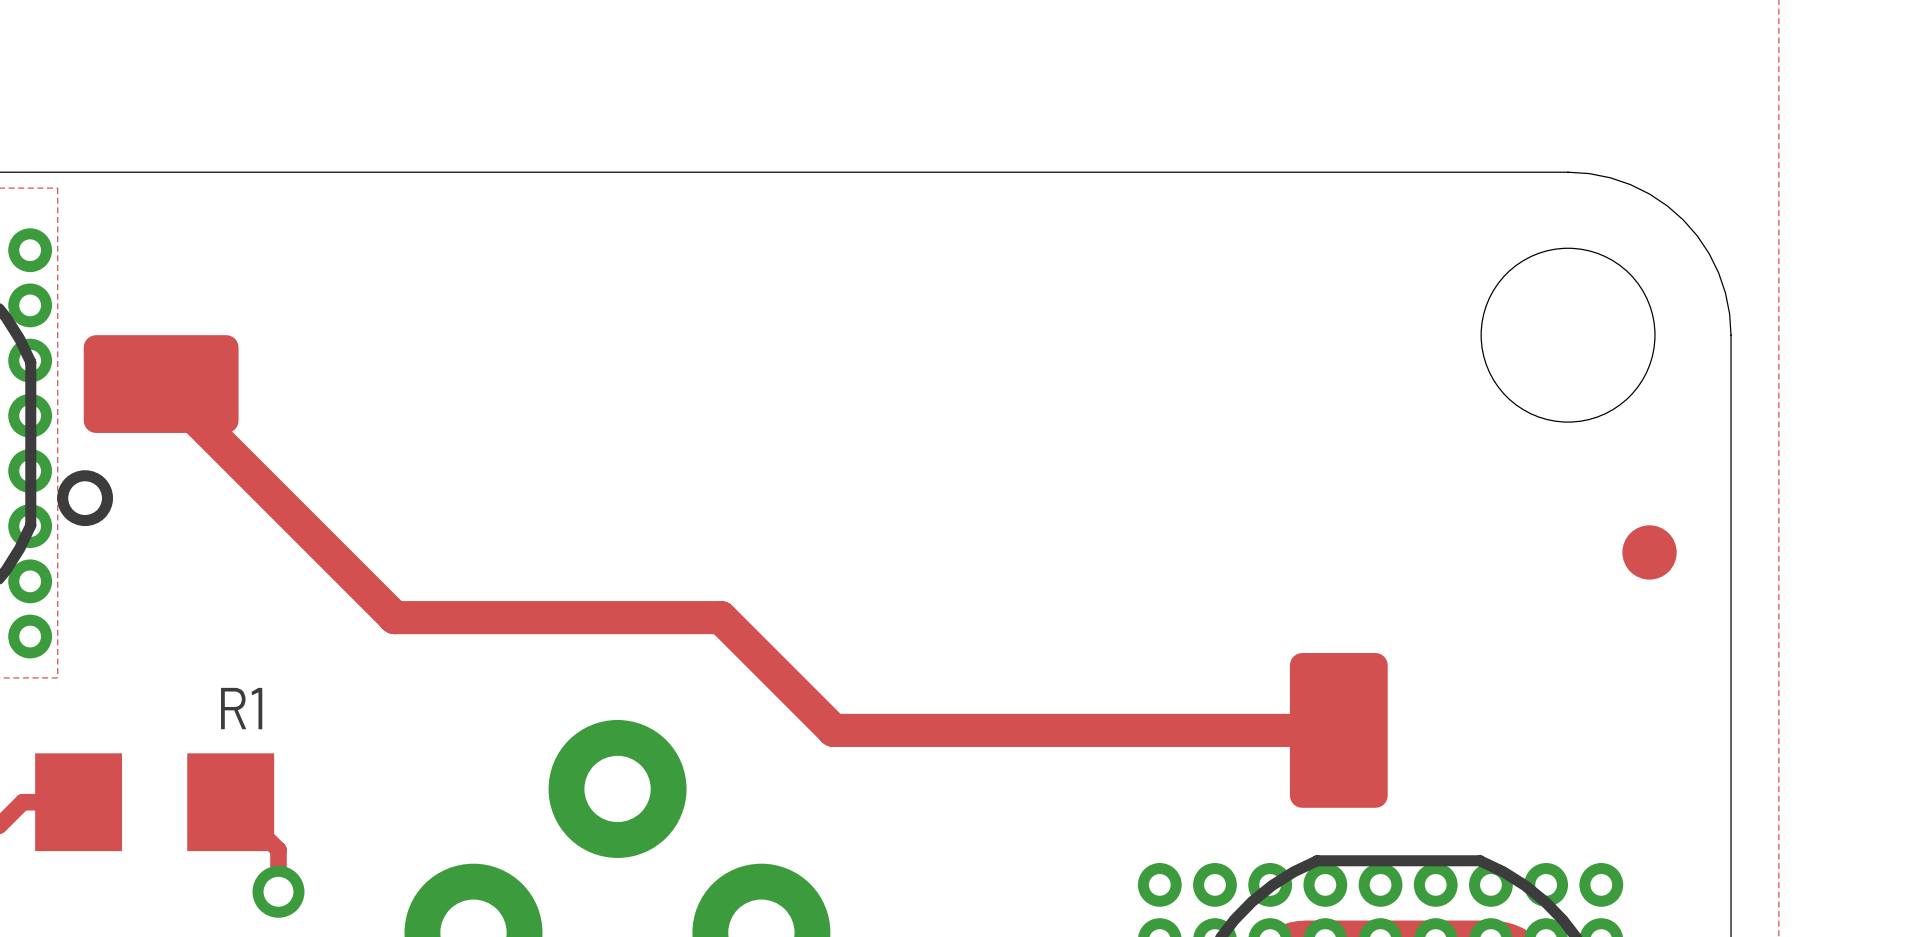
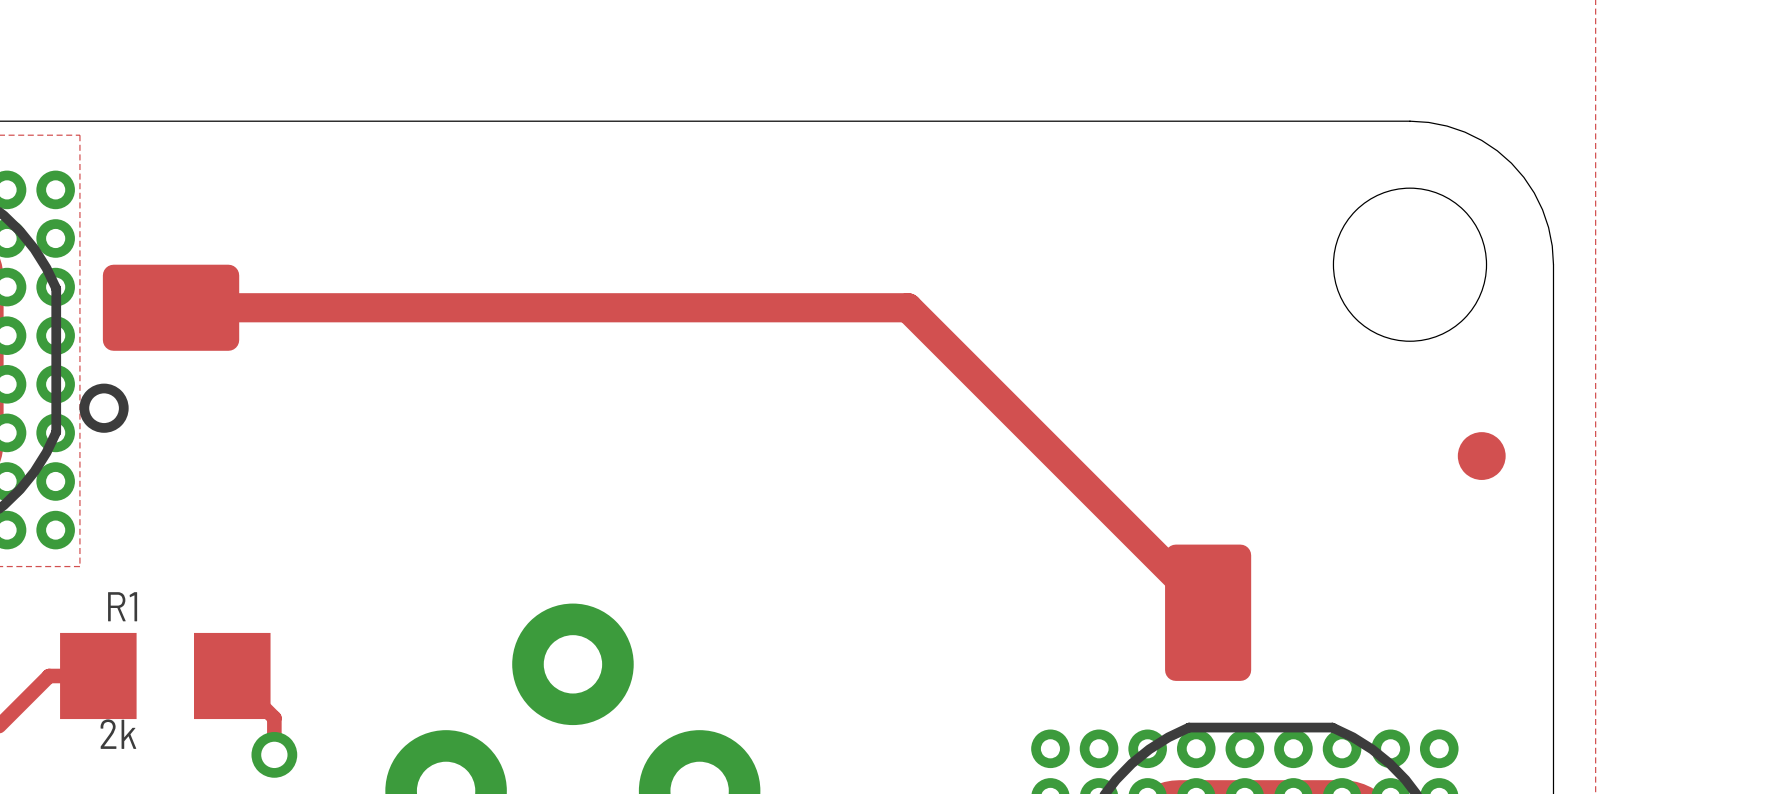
track: (161, 384) (394, 617) (720, 617) (833, 730) (1338, 730) -> (171, 307) (907, 307) (1212, 612) (1208, 612)
R1 name position: R1 (241, 708) -> R1 (122, 606)
R1 value: none -> 2k (118, 734)

